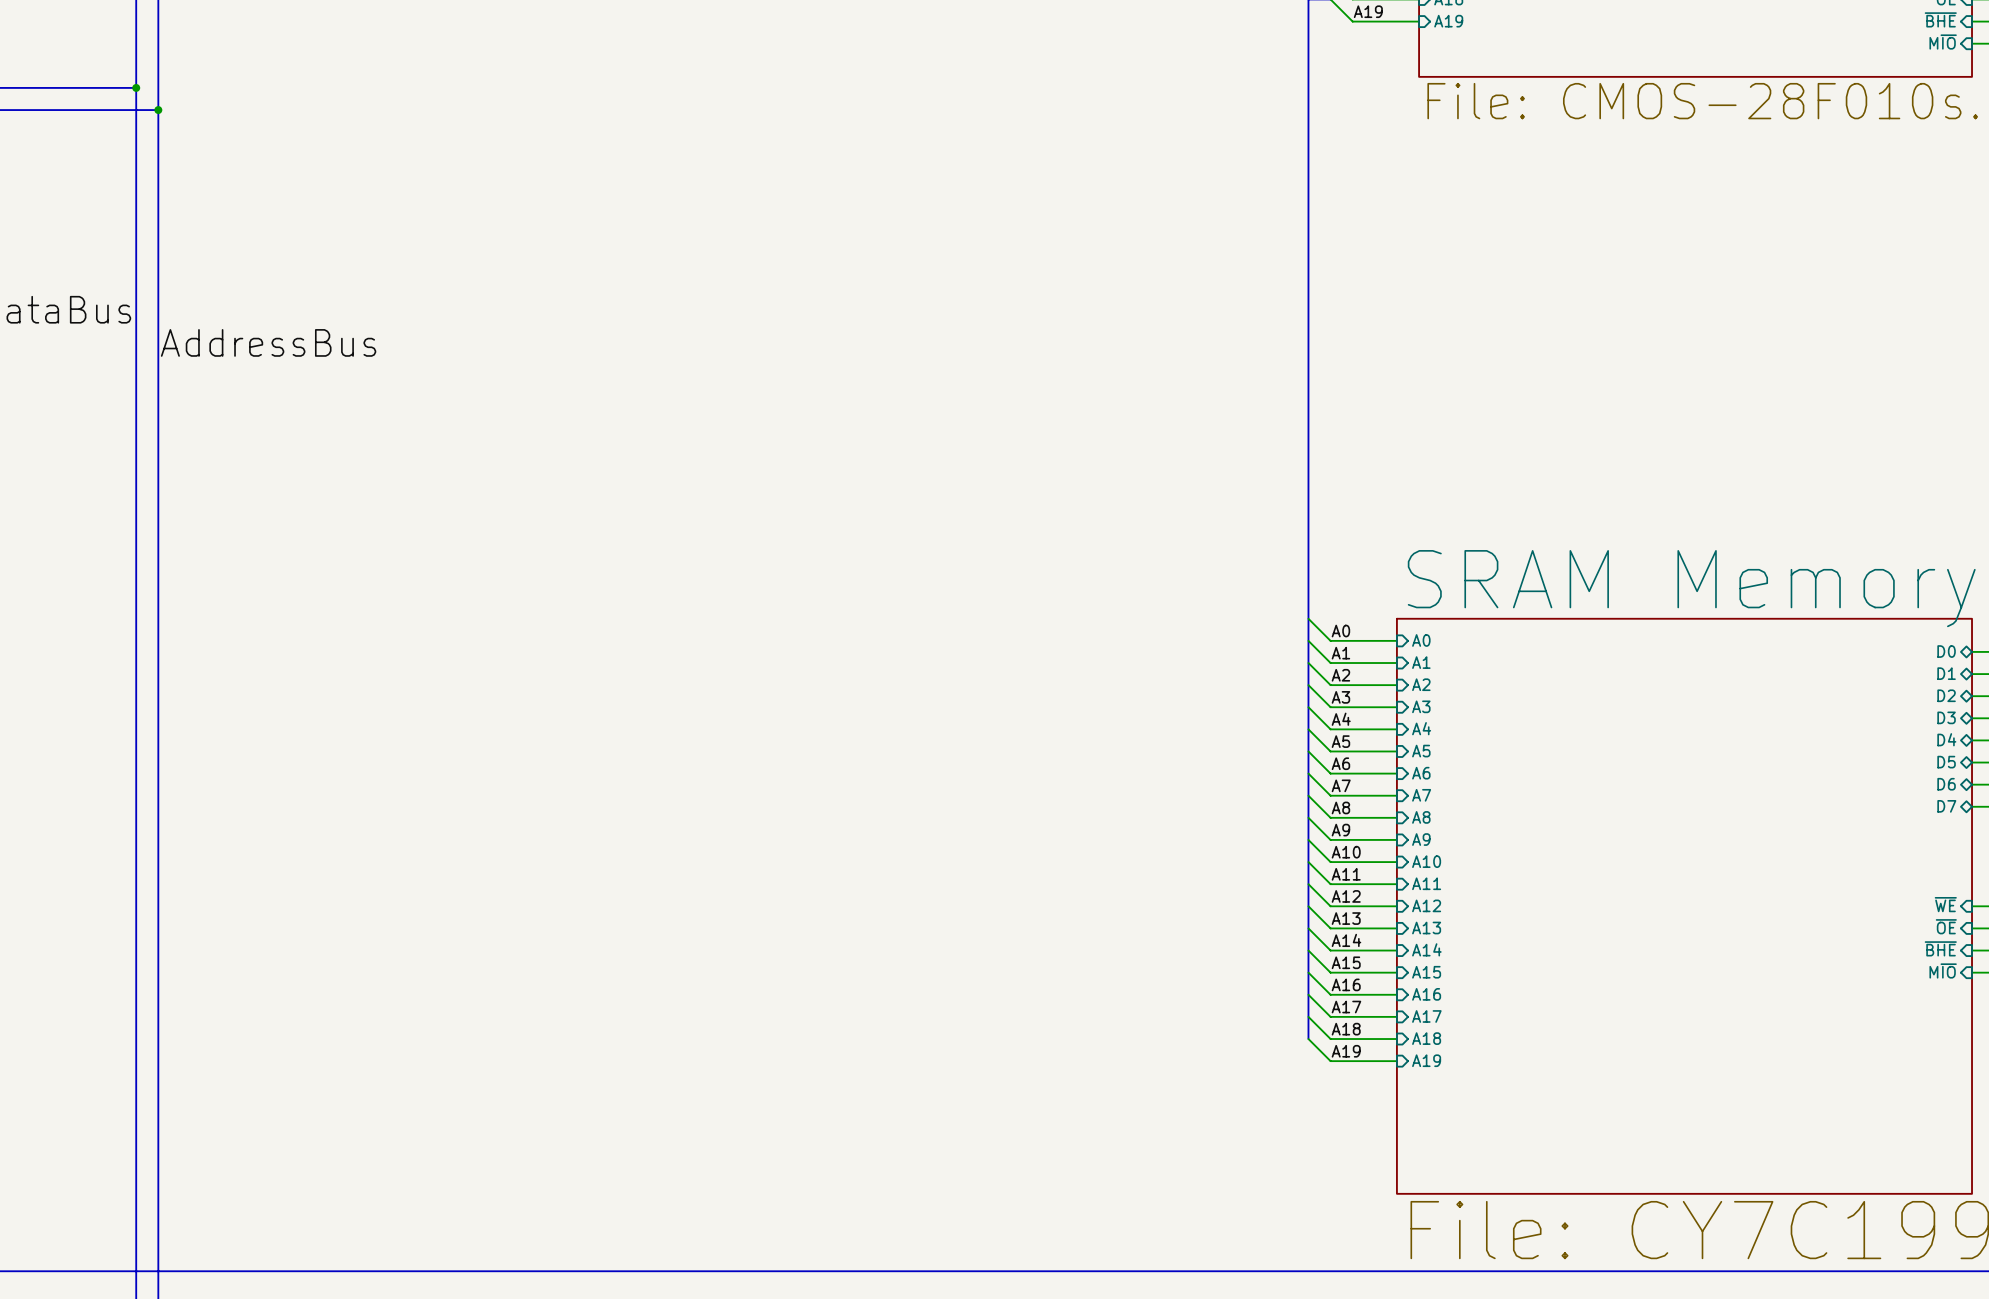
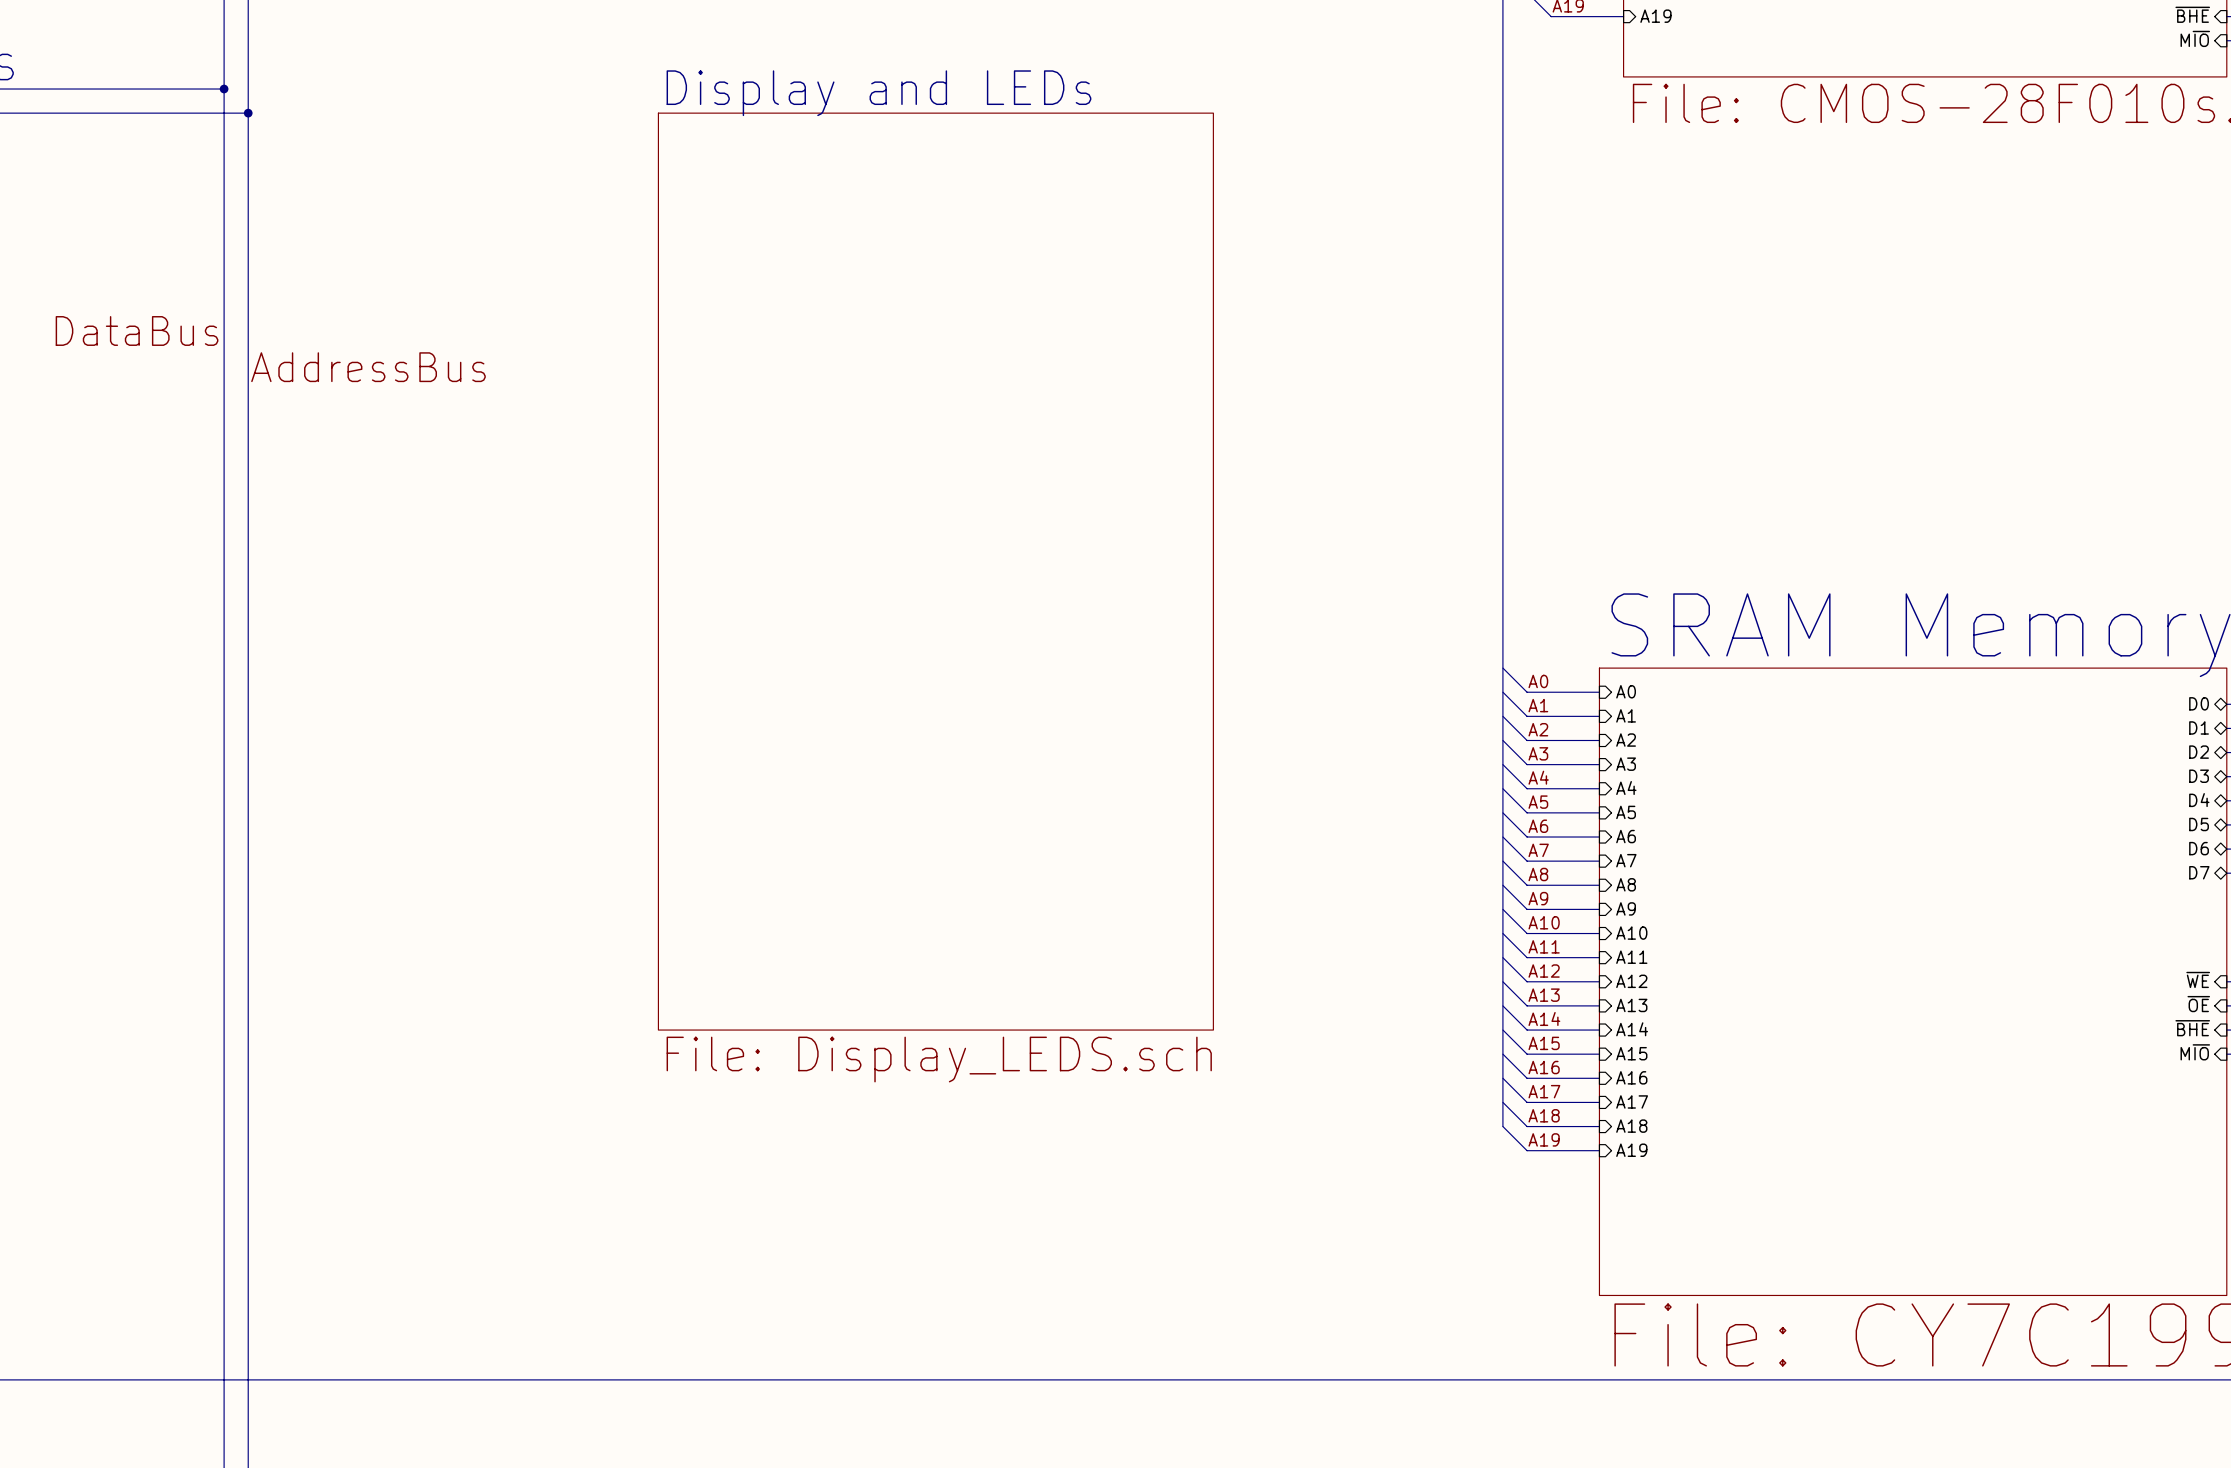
sheet Display and LEDs: none -> File: Display_LEDS.sch (935, 571)

